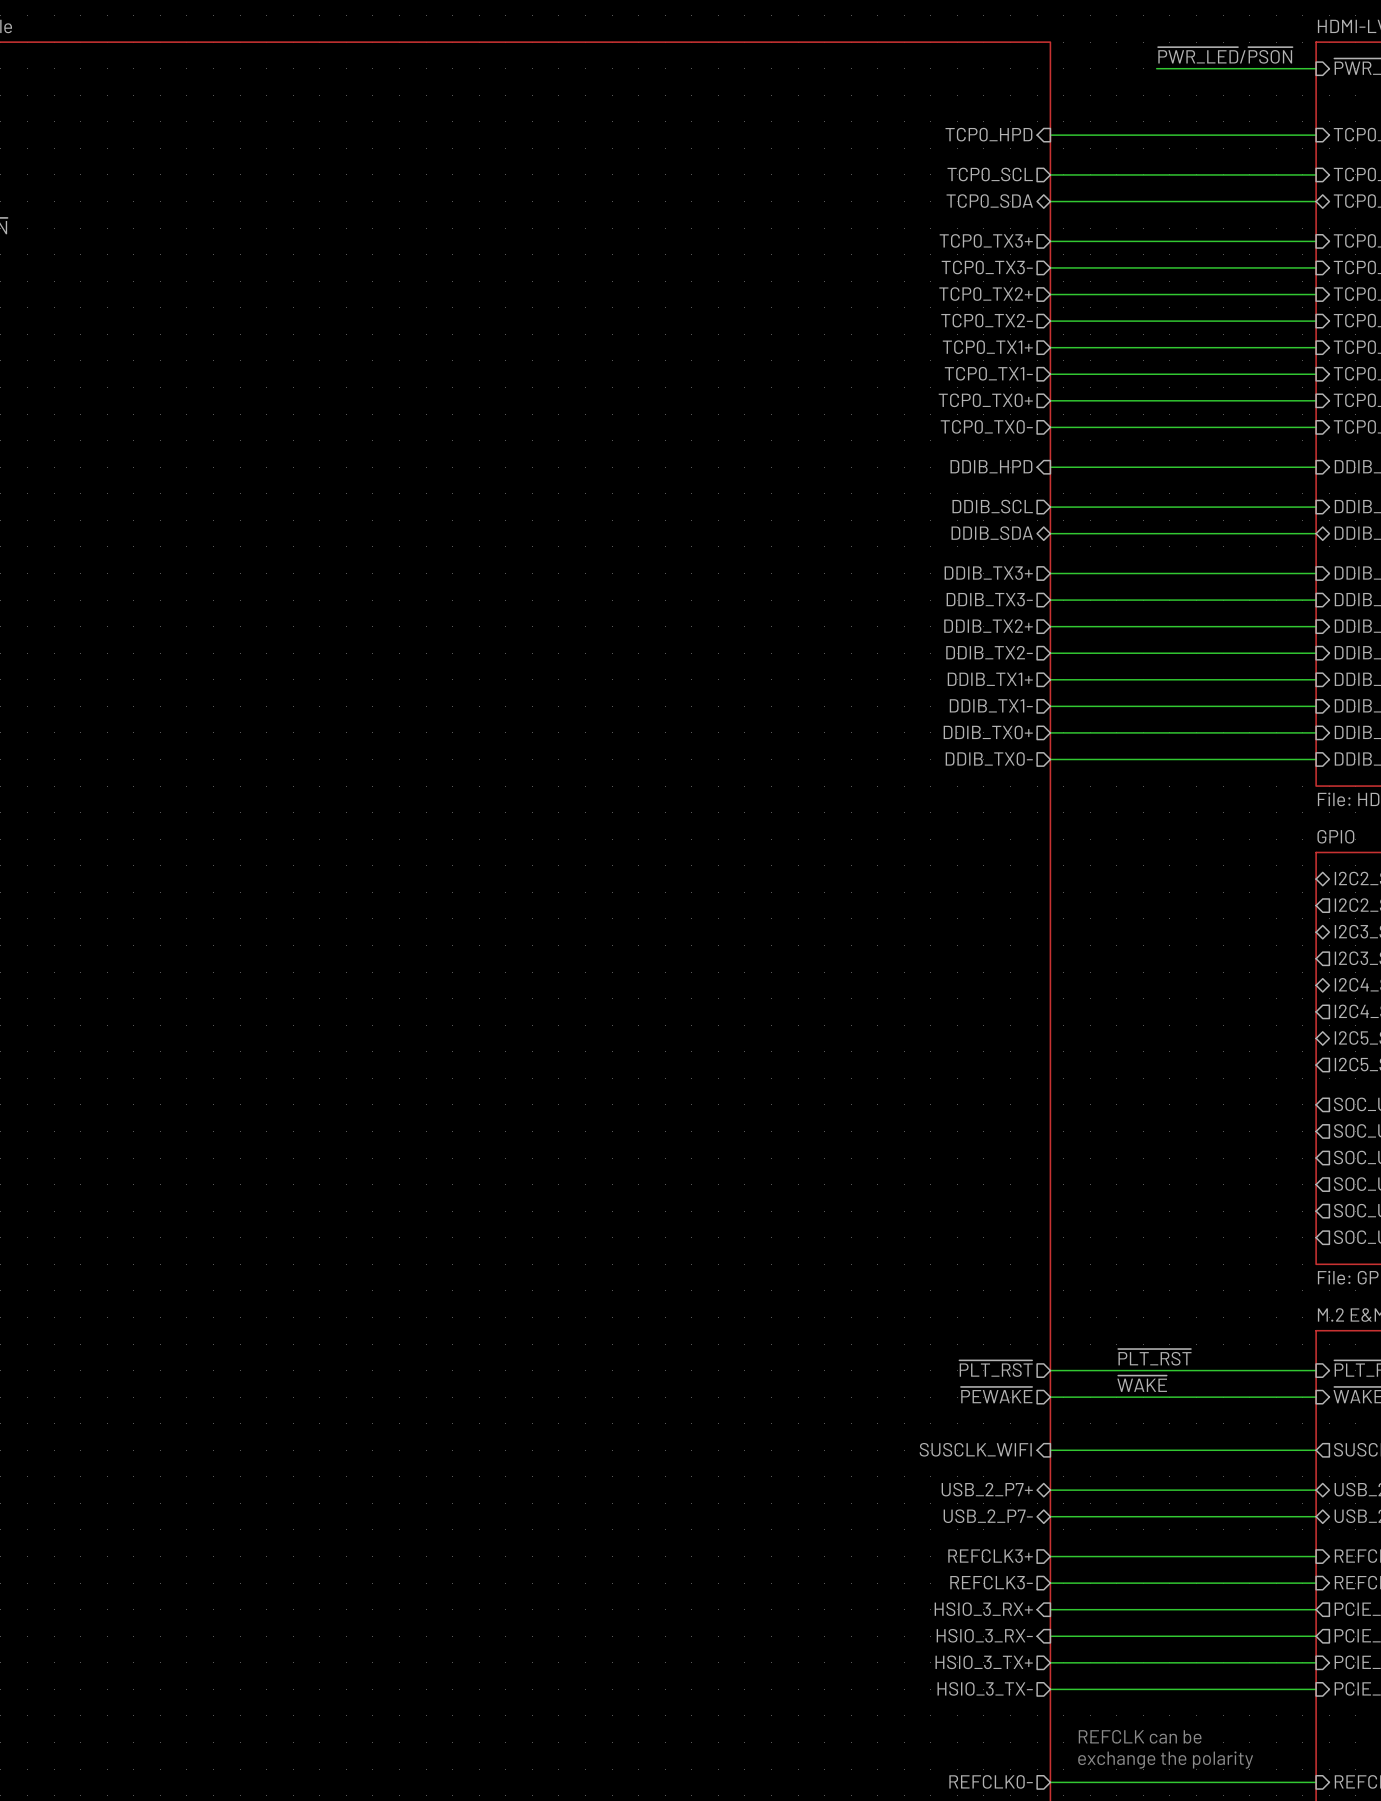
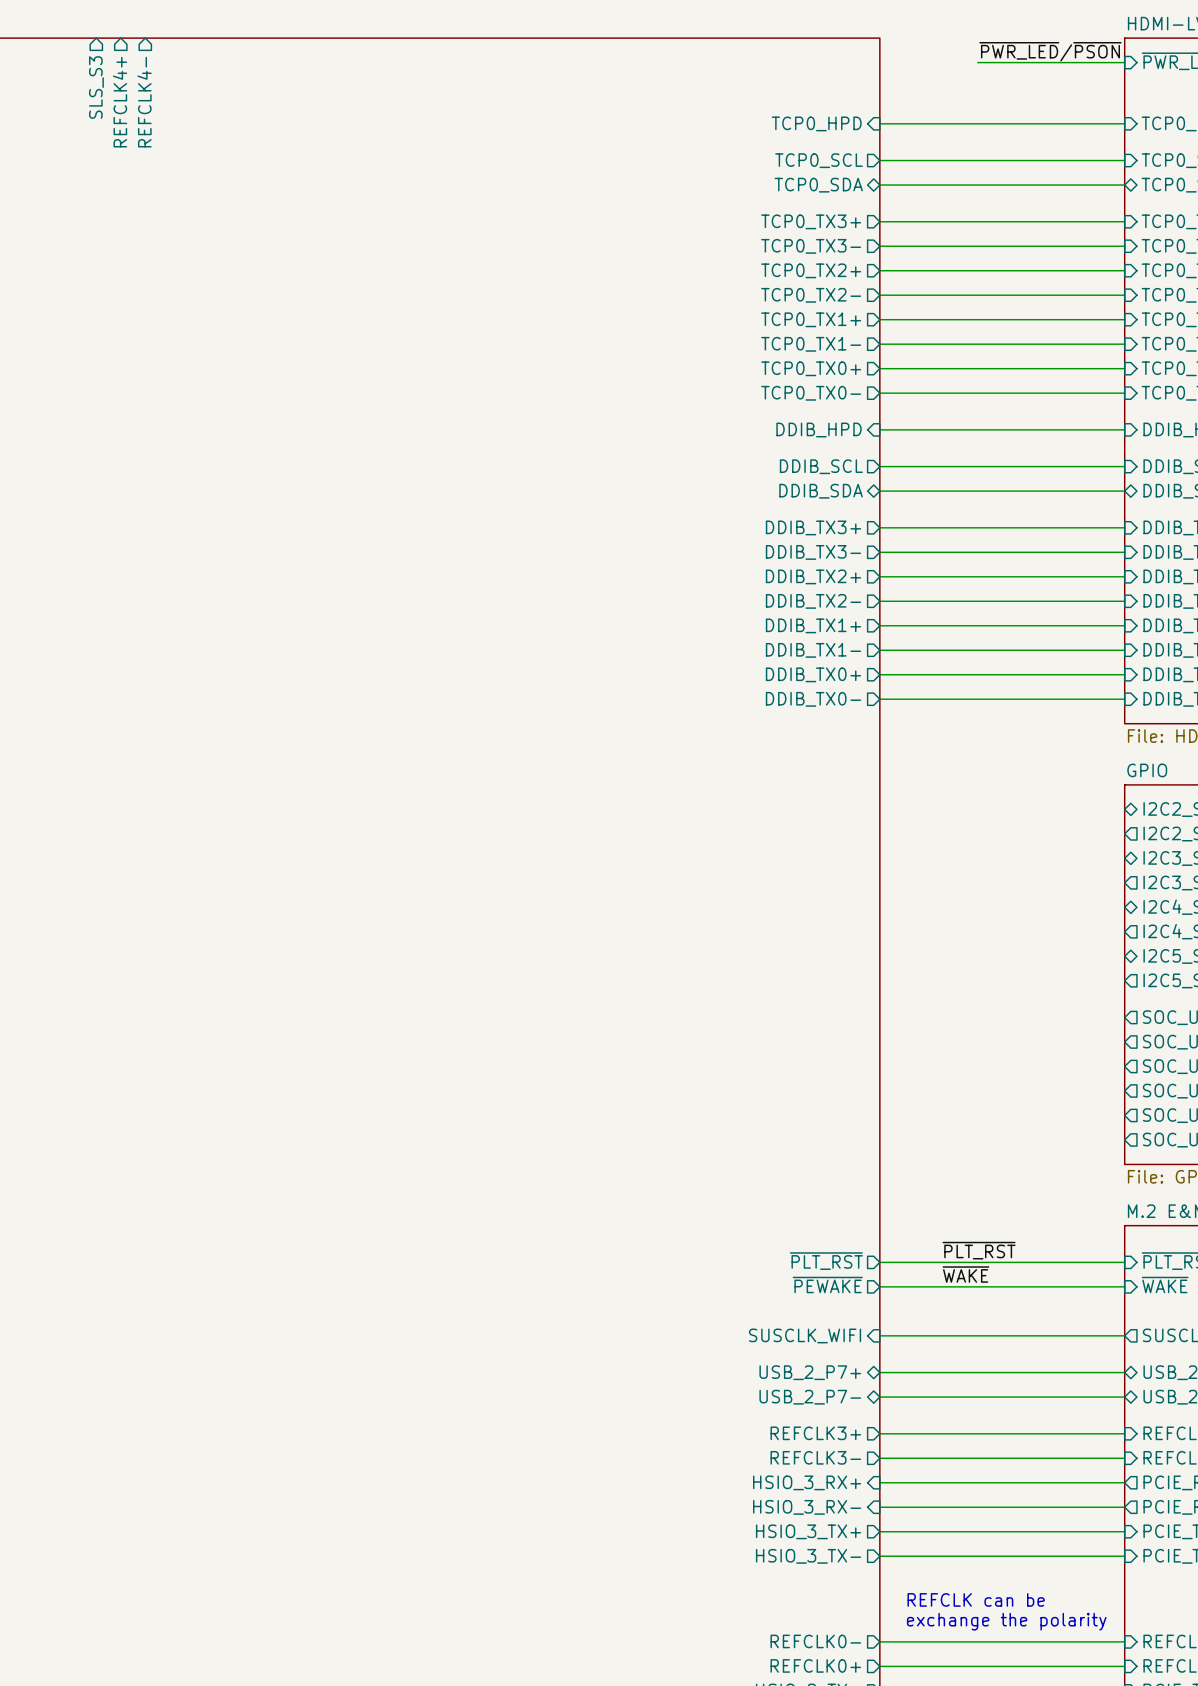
sheet pin: none -> SLS_S3 (96, 87)
sheet pin: none -> REFCLK4- (144, 102)
sheet pin: none -> REFCLK4+ (120, 102)

